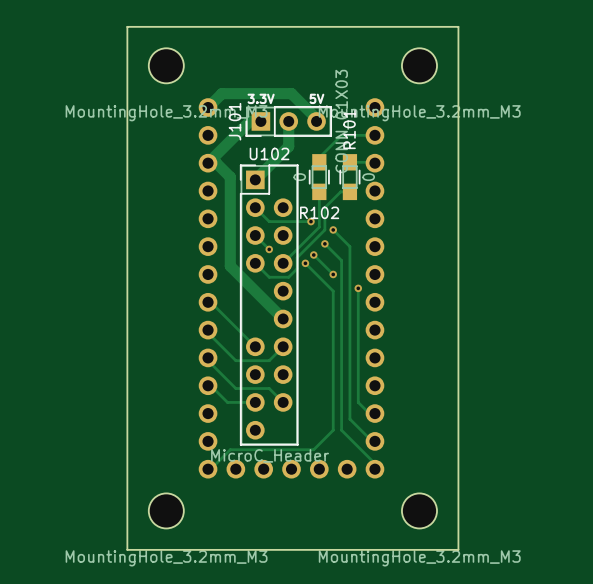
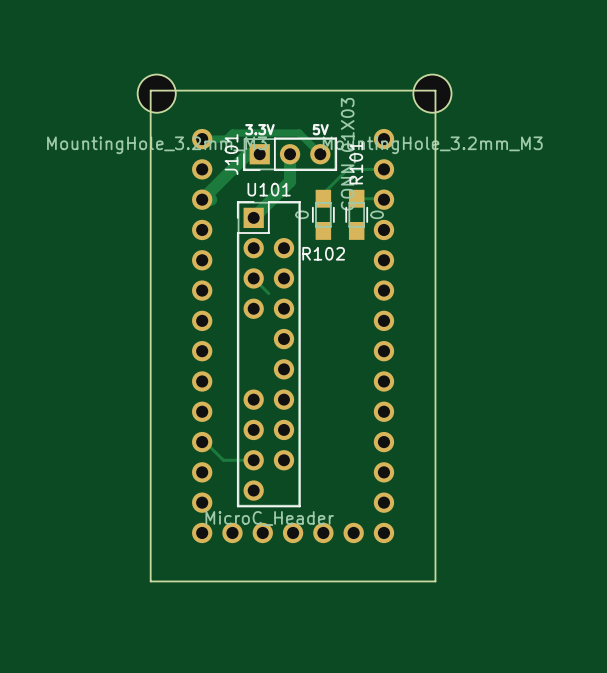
board edge: (127, 26) (458, 26) (458, 549) (127, 549) (127, 26) -> (150, 90) (150, 581) (435, 581) (435, 90) (150, 90)
track: (208, 107) (221, 93) (291, 93) (316, 118) (316, 121) -> (202, 139) (226, 139) (232, 133) (299, 133) (320, 154)
U102 name: U102 (269, 153) -> U101 (269, 189)
track: (216, 163) (230, 177) (230, 266) (283, 318) -> none
track: (319, 191) (319, 227) (283, 263) -> none
track: (349, 191) (340, 191) (324, 207) (324, 229) (297, 257) (297, 268) (288, 277) (269, 277) (255, 263) -> none
track: (255, 207) (269, 221) (310, 221) -> none
via: (310, 221) -> none
track: (333, 229) (349, 246) (349, 419) (372, 441) (374, 441) -> none
via: (333, 229) -> none
track: (324, 243) (341, 260) (341, 430) (374, 463) (374, 469) -> none
via: (324, 243) -> none
via: (269, 249) -> none
track: (313, 254) (333, 274) -> none
via: (313, 254) -> none
track: (305, 263) (333, 291) (333, 430) (313, 449) (230, 449) (210, 469) (208, 469) -> none
via: (305, 263) -> none
via: (333, 274) -> none
track: (358, 288) (358, 402) (369, 413) (374, 413) (374, 410) -> none
via: (358, 288) -> none
track: (208, 302) (210, 302) (255, 346) -> none
track: (208, 330) (208, 332) (235, 360) (269, 360) (283, 346) -> none
track: (208, 357) (208, 360) (235, 388) (269, 388) (283, 402) -> none
part: MountingHole_3.2mm_M3 (166, 510) -> none
part: MountingHole_3.2mm_M3 (419, 510) -> none

